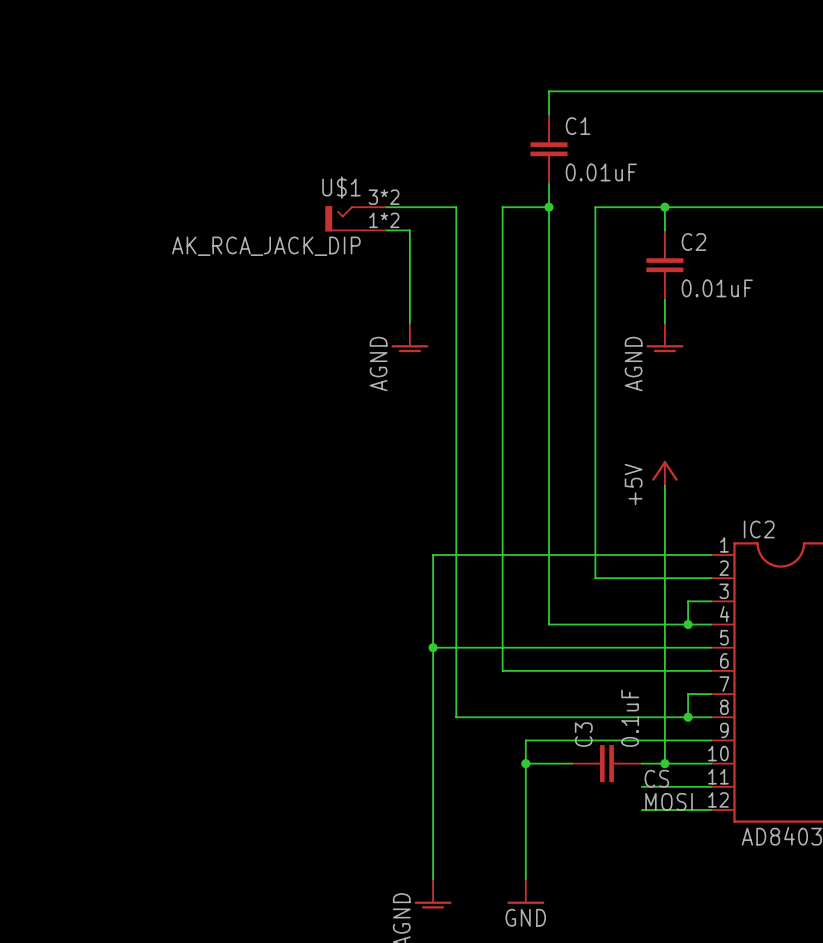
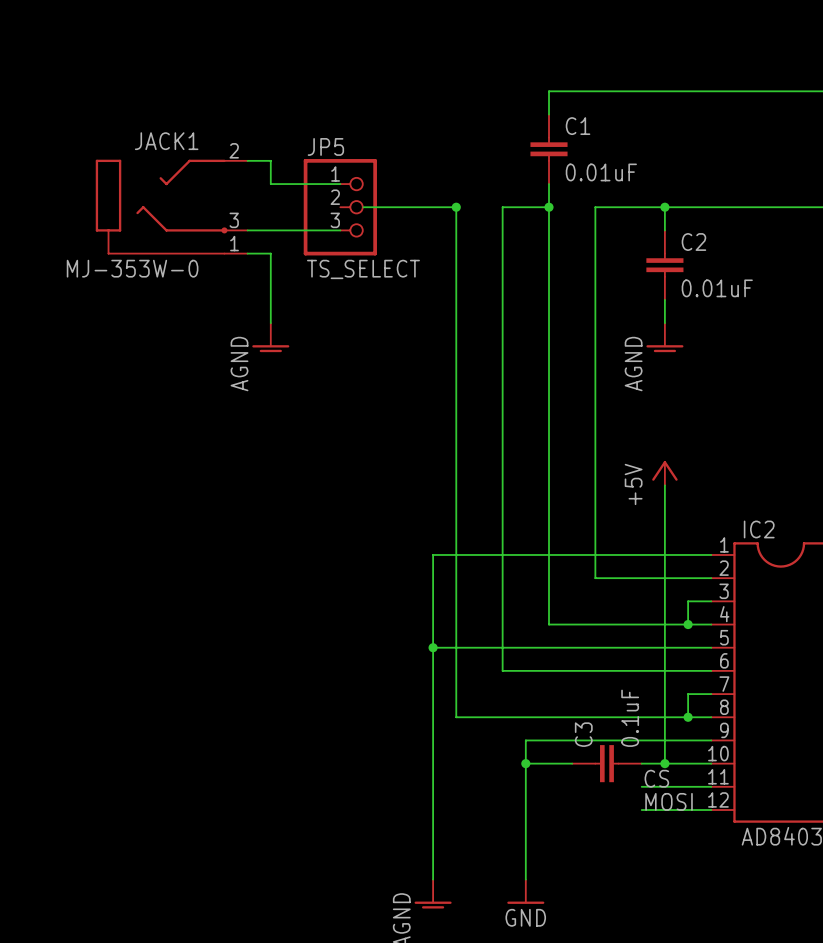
wire: none -> (247, 160) (270, 160) (270, 184) (340, 184)
JACK1: none -> MJ-353W-0 (171, 207)
JP5: none -> TS_SELECT (340, 207)
junction: none -> (456, 207)
U$1: AK_RCA_JACK_DIP (356, 218) -> none
wire: none -> (247, 230) (340, 230)
wire: (386, 230) (409, 230) (409, 323) -> none
wire: none -> (247, 253) (270, 253) (270, 323)
power symbol position: AGND (409, 337) -> AGND (270, 337)

